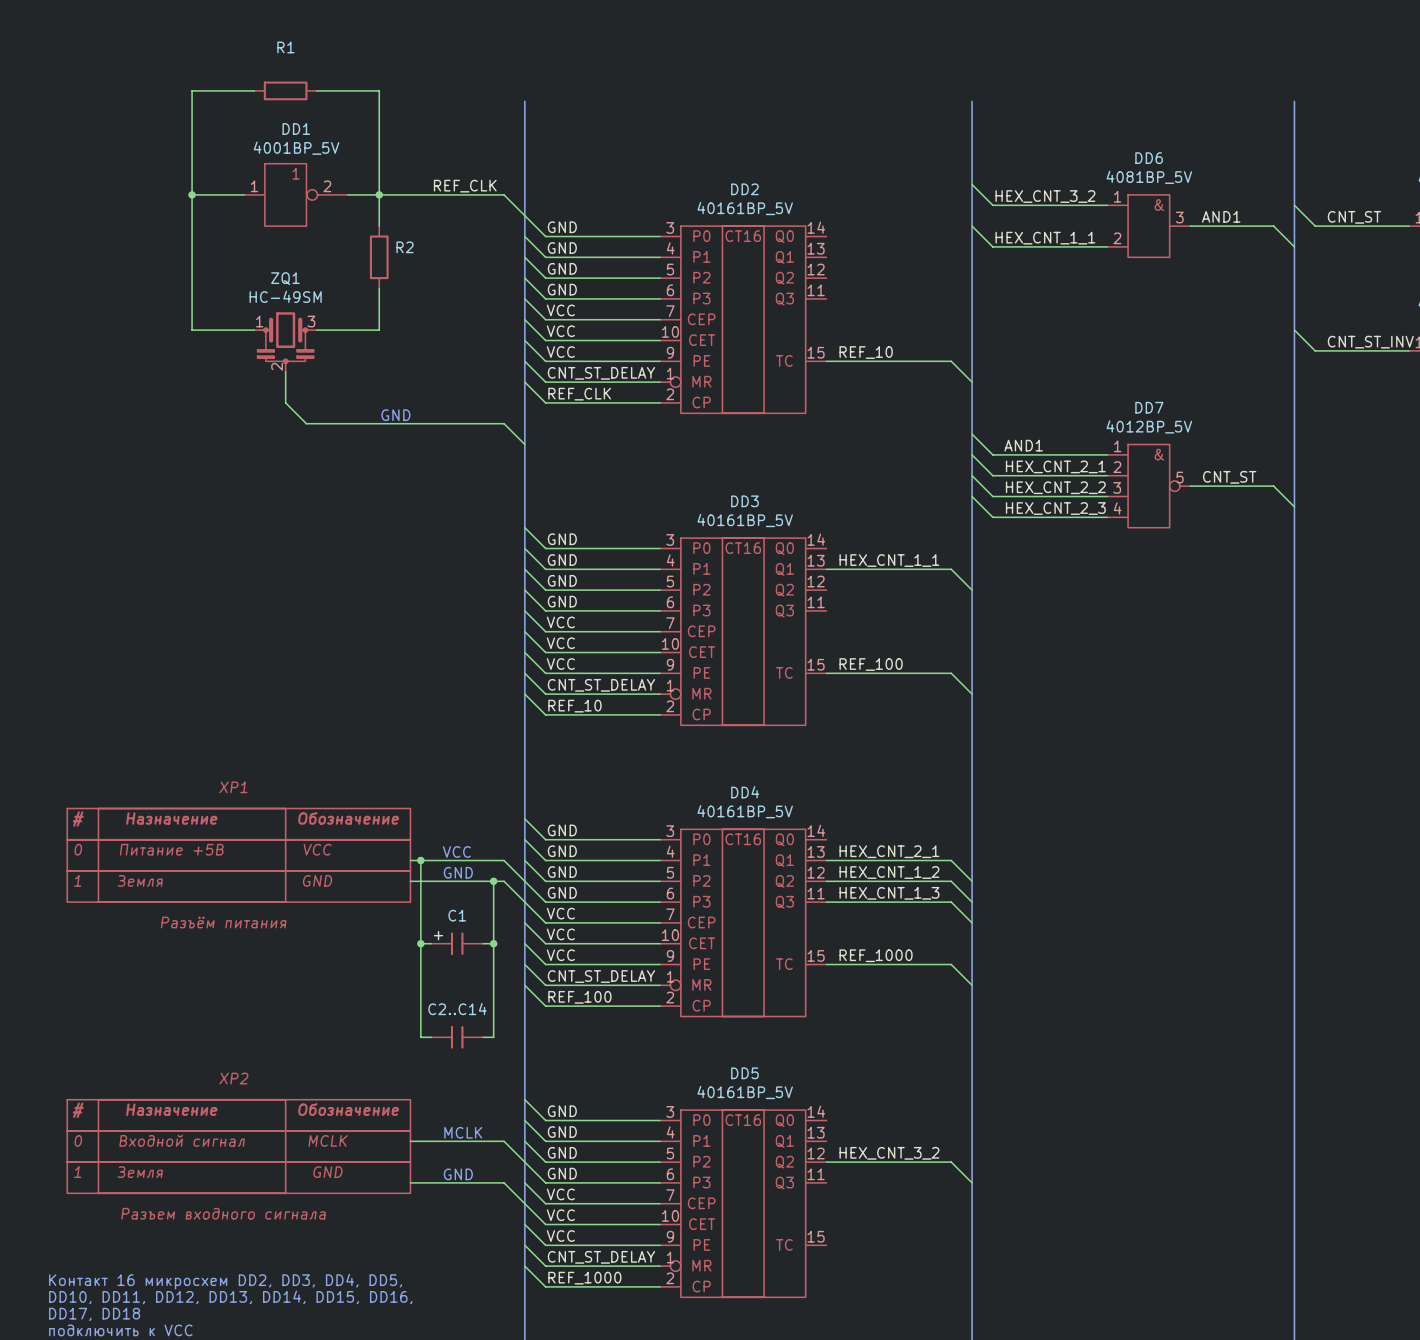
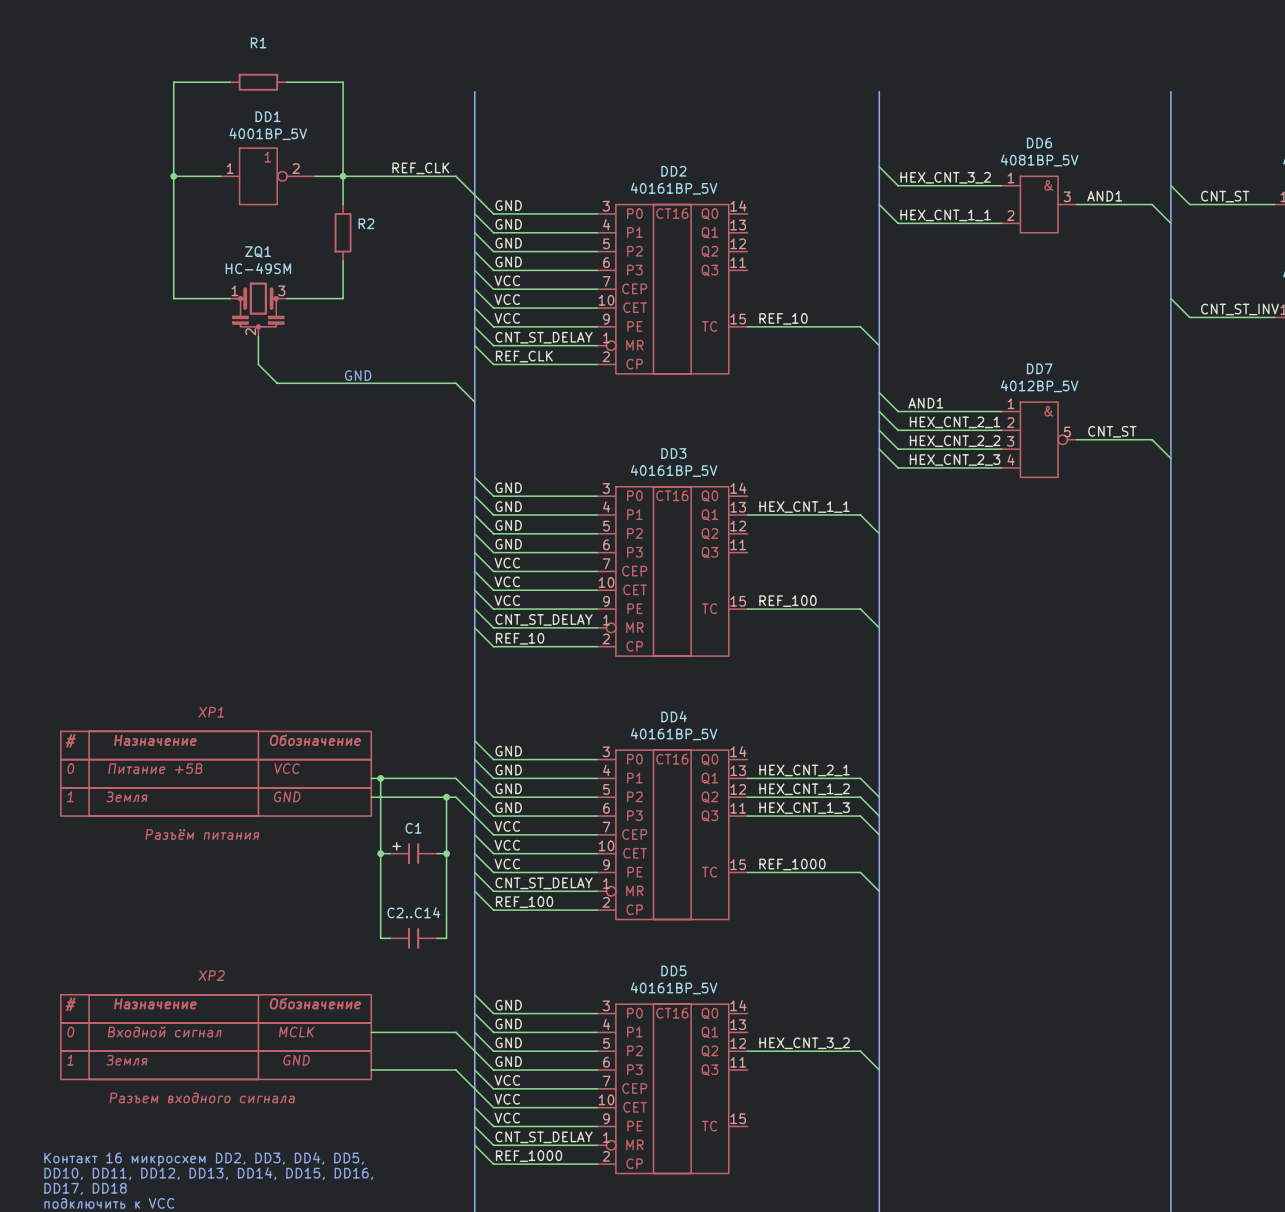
text: VCC (456, 851) -> none
text: GND (458, 872) -> none
text: MCLK (463, 1132) -> none
text: GND (458, 1174) -> none

